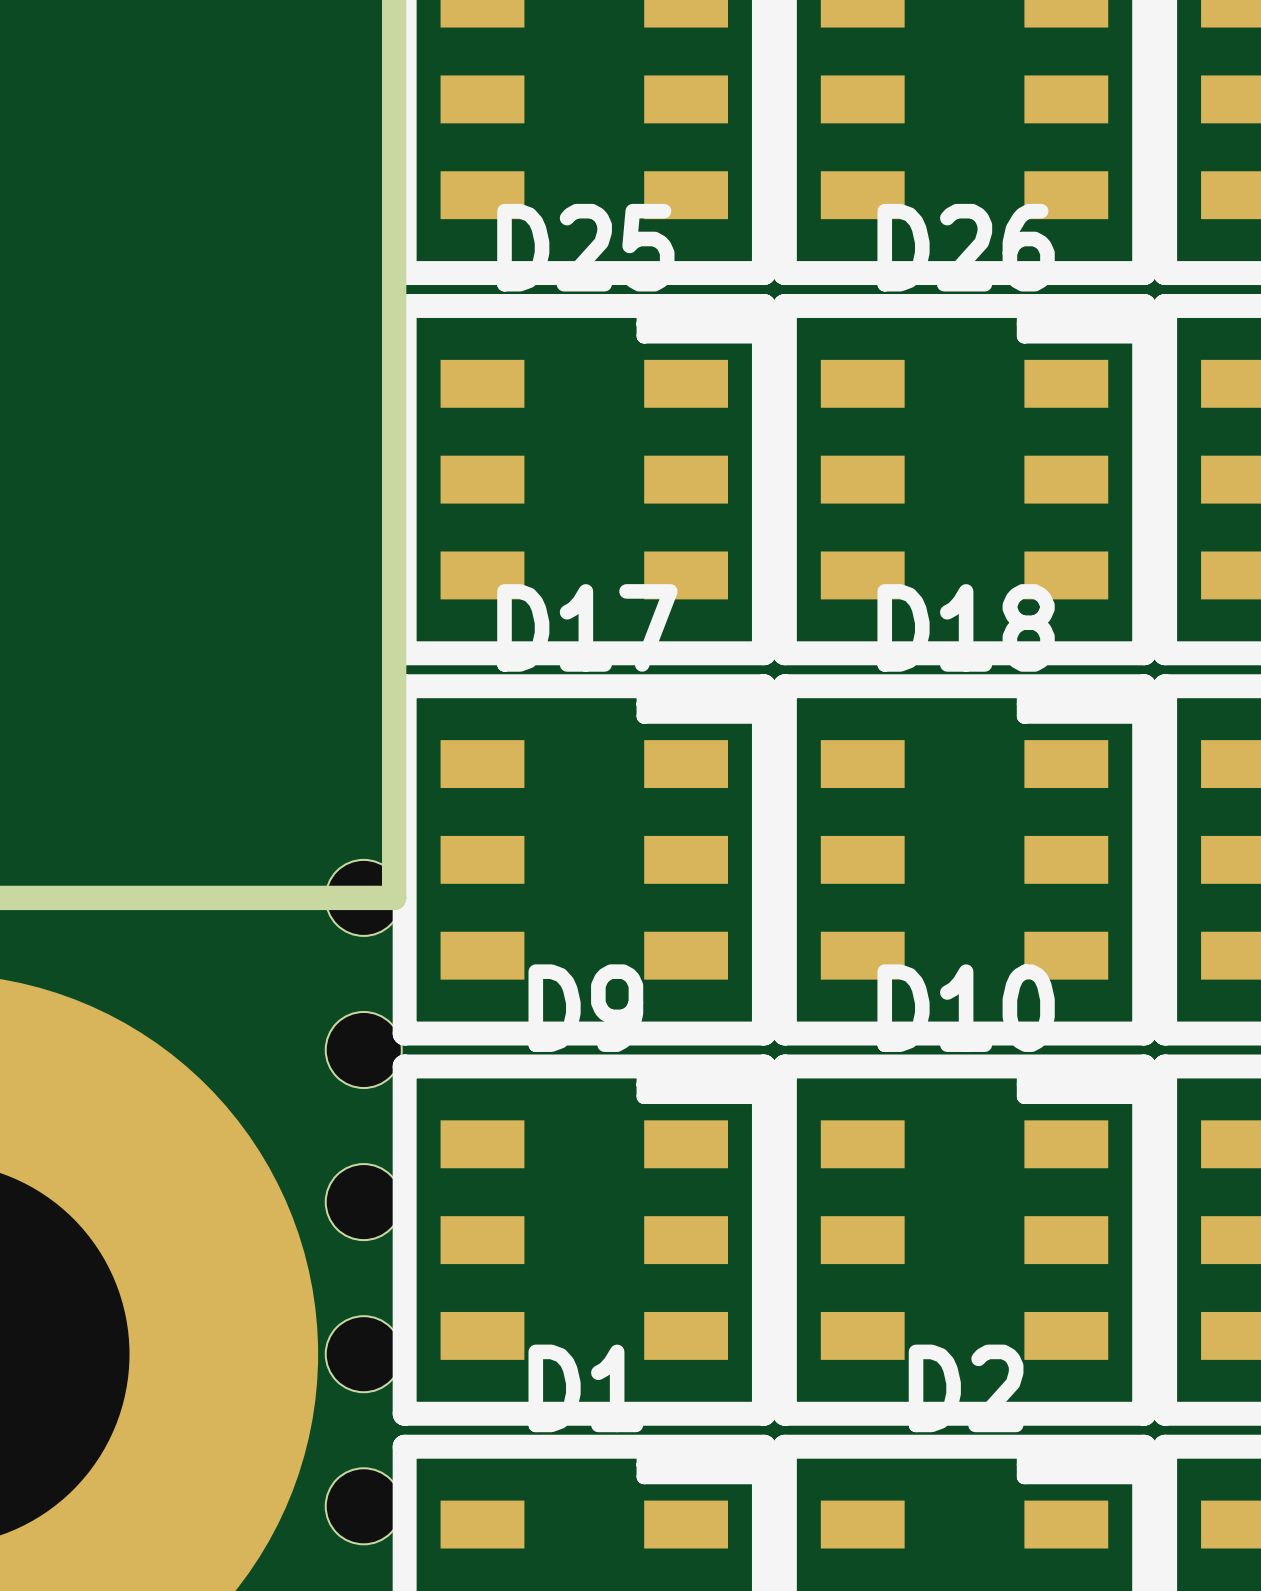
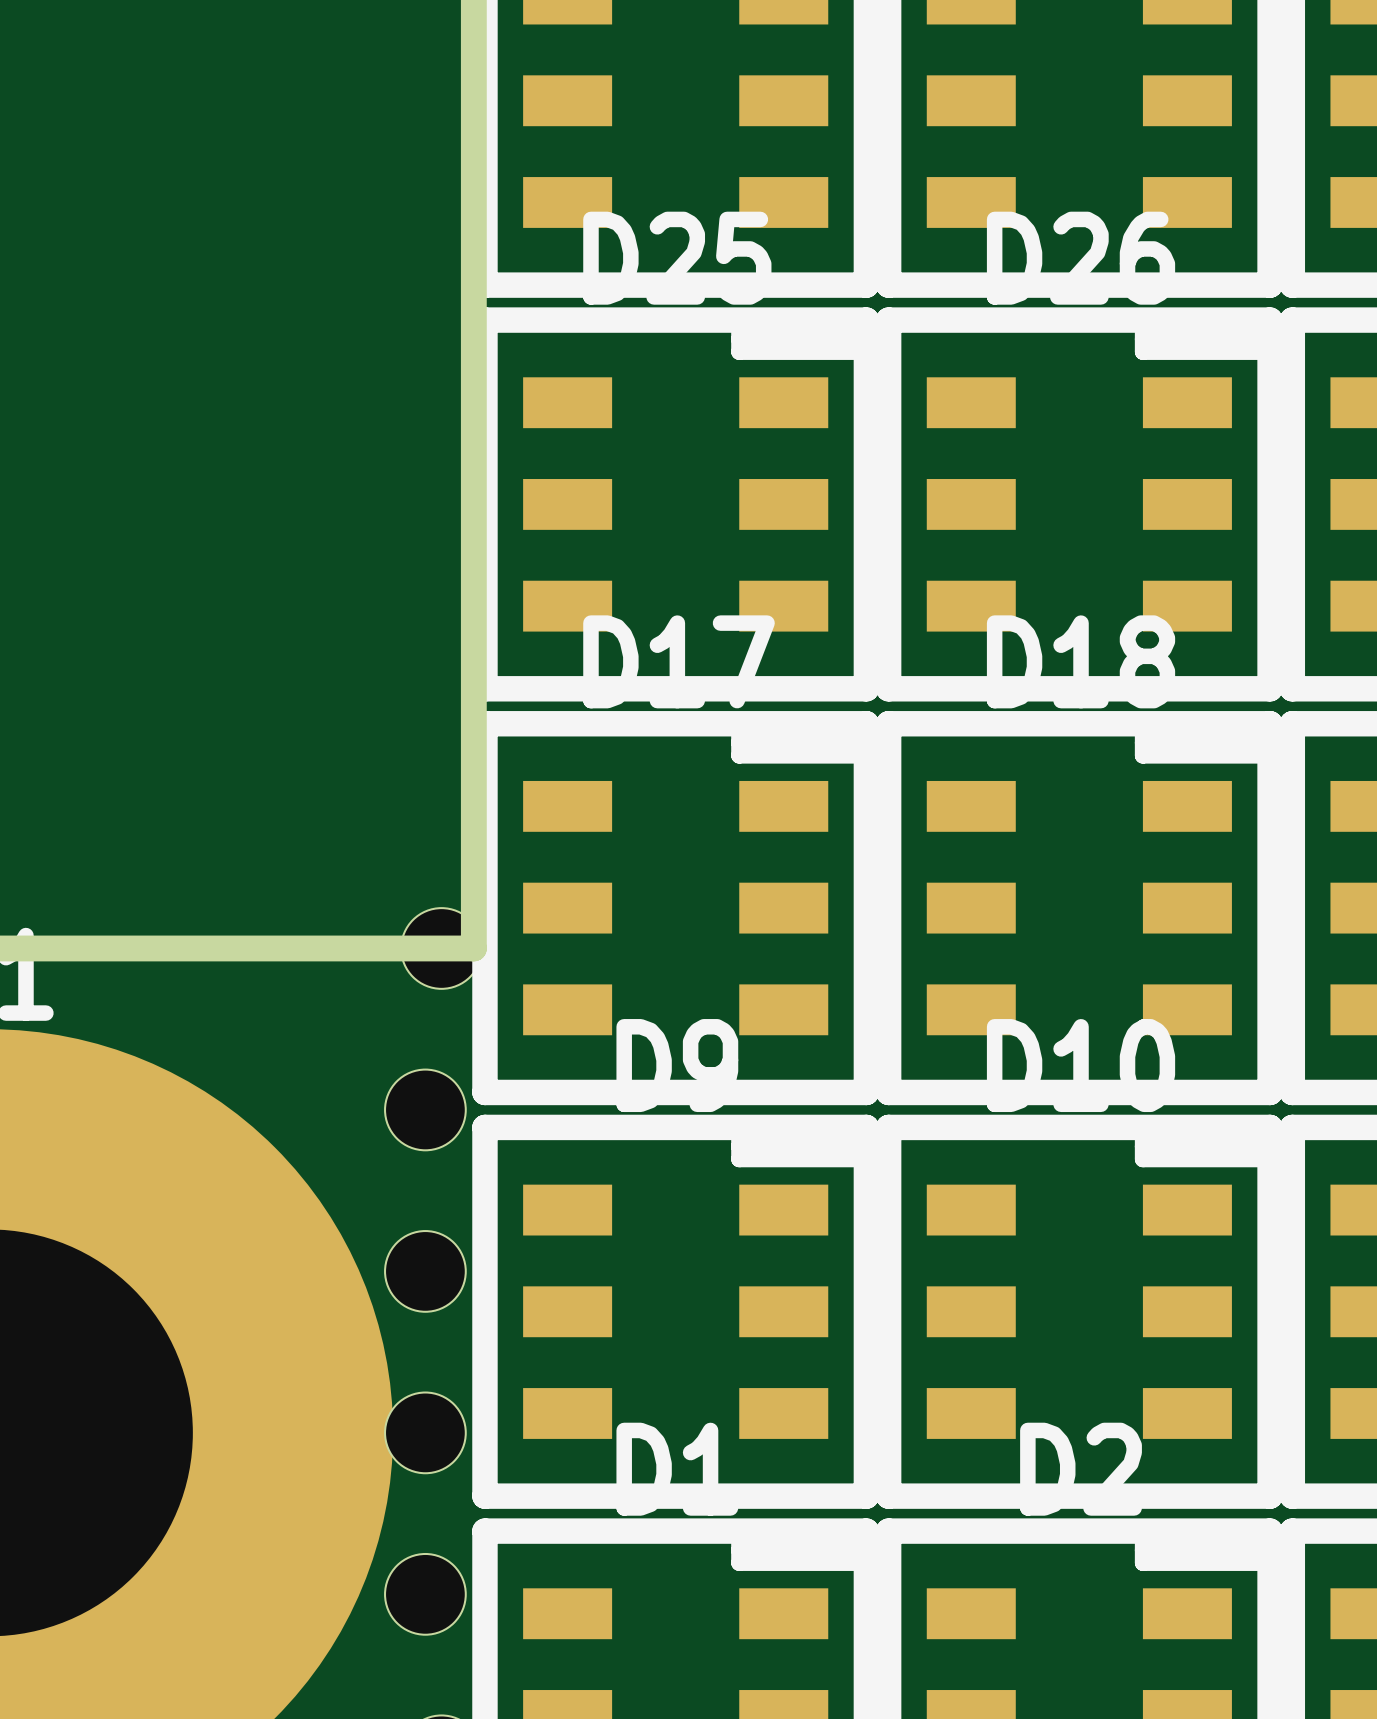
hole position: (363, 1050) -> (425, 1109)
hole position: (363, 1202) -> (425, 1271)
hole position: (363, 1354) -> (425, 1432)
hole position: (363, 1506) -> (425, 1594)

